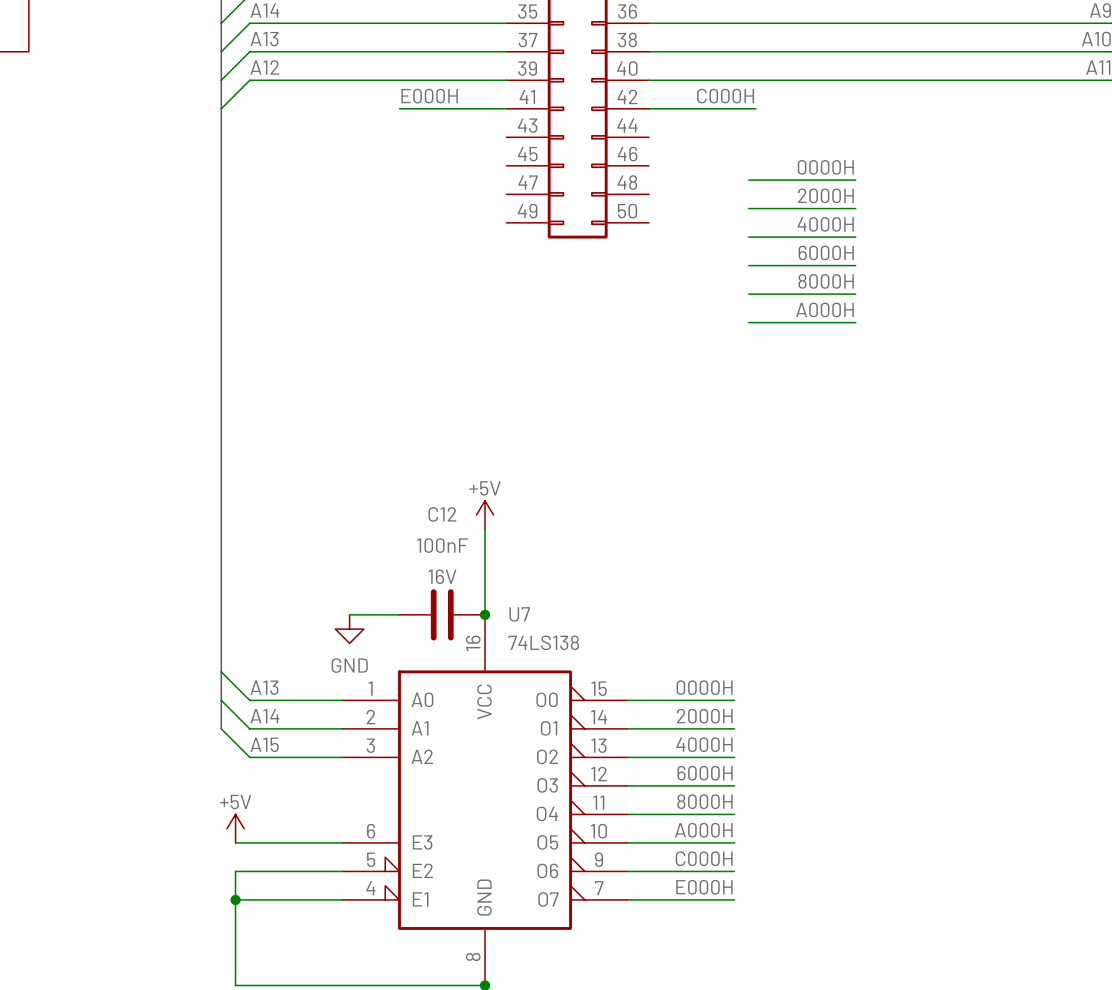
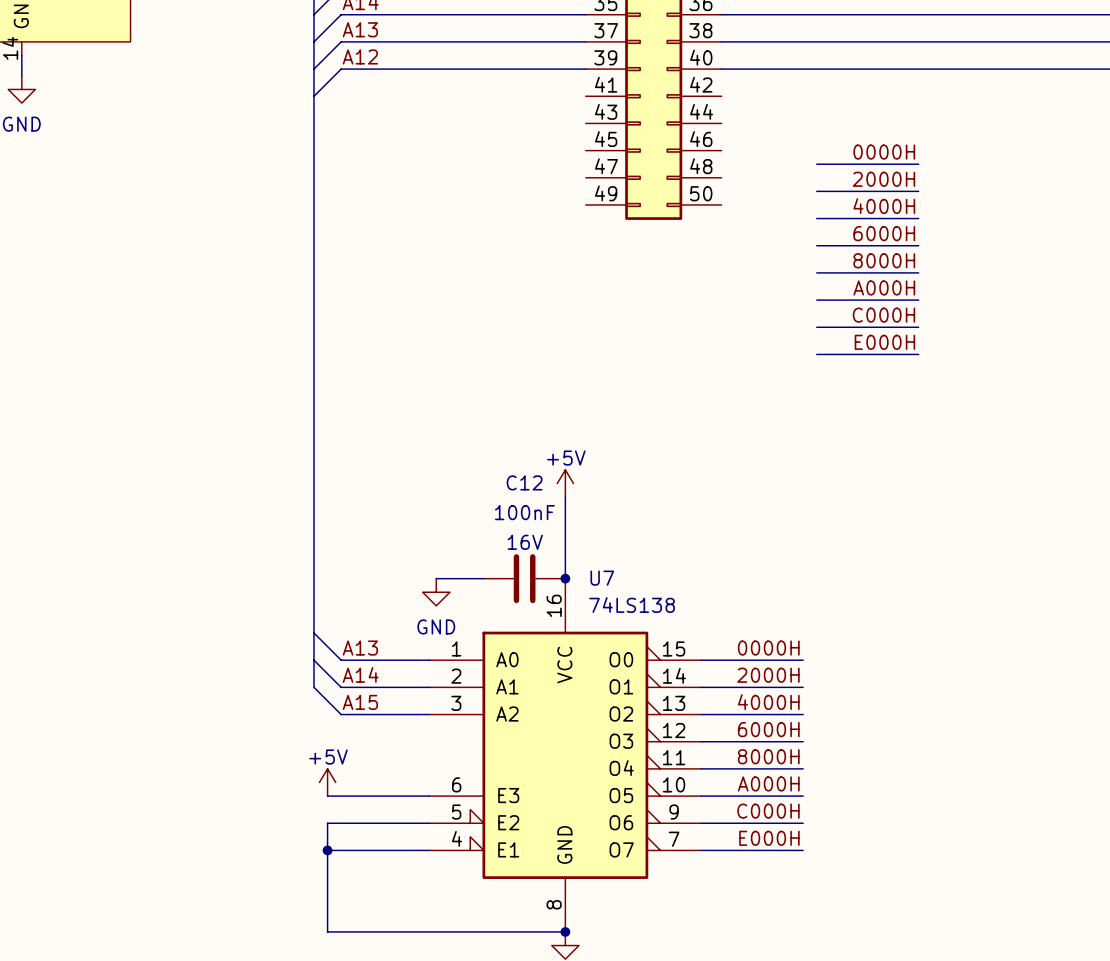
label: E000H (429, 96) -> none
label position: C000H (725, 96) -> C000H (883, 315)
wire: (399, 108) (506, 108) -> none
wire: (648, 108) (755, 108) -> (816, 327) (918, 327)
label: none -> E000H (884, 342)
wire: none -> (816, 354) (918, 354)

